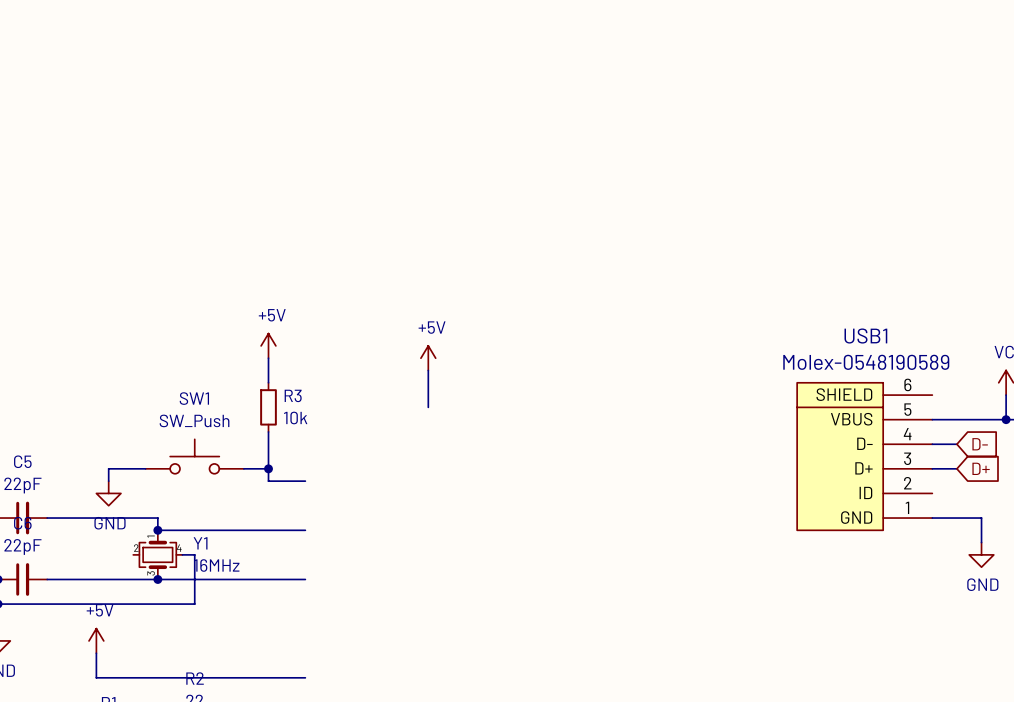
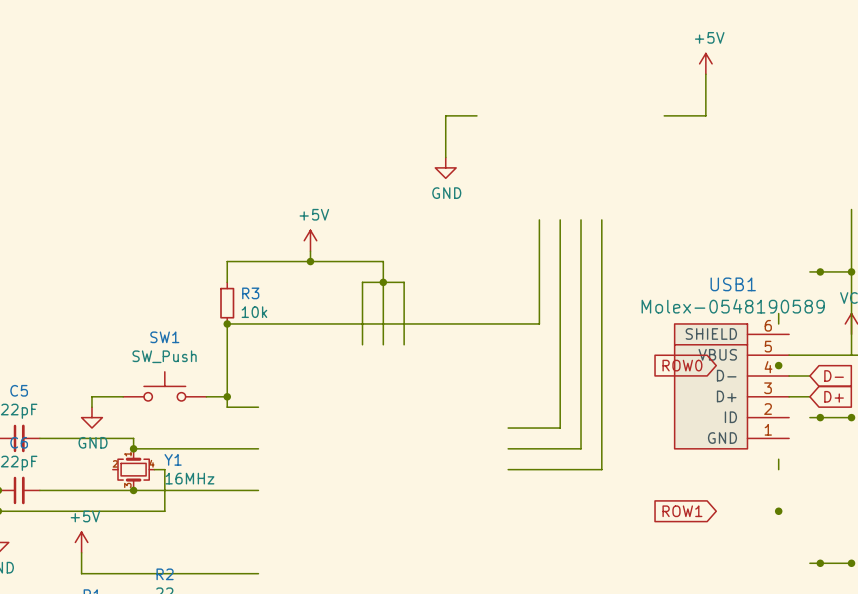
power symbol: none -> +5V (705, 63)
wire: none -> (705, 74) (705, 115) (664, 115)
wire: none -> (476, 115) (445, 115) (445, 157)
power symbol: none -> GND (445, 167)
wire: none -> (851, 209) (851, 334)
wire: none -> (539, 219) (539, 323) (227, 323) (227, 365)
wire: none -> (560, 219) (560, 428) (508, 428)
wire: none -> (581, 219) (581, 448) (508, 448)
wire: none -> (601, 219) (601, 469) (508, 469)
power symbol: none -> +5V (310, 240)
wire: none -> (310, 251) (310, 261)
junction: none -> (310, 261)
wire: none -> (809, 271) (851, 271)
junction: none -> (820, 271)
junction: none -> (851, 271)
wire: none -> (227, 282) (227, 261) (383, 261) (383, 344)
junction: none -> (383, 282)
power symbol: +5V (268, 345) -> none
wire: (268, 358) (268, 382) -> none
power symbol: +5V (428, 358) -> none
wire: none -> (362, 313) (362, 282) (404, 282) (404, 344)
wire: none -> (778, 313) (778, 323)
junction: none -> (227, 323)
R3 position: (268, 407) -> (227, 303)
junction: (1006, 419) -> none
global label: none -> ROW0 (682, 365)
junction: none -> (778, 365)
wire: none -> (809, 417) (851, 417)
junction: none -> (820, 417)
junction: none -> (851, 417)
wire: (932, 518) (981, 518) (981, 542) -> none
wire: none -> (778, 459) (778, 469)
power symbol: GND (981, 554) -> none
global label: none -> ROW1 (682, 511)
junction: none -> (778, 511)
wire: none -> (809, 563) (851, 563)
junction: none -> (820, 563)
junction: none -> (851, 563)

